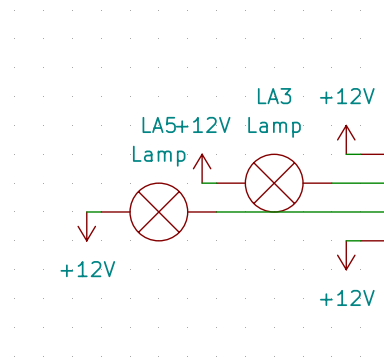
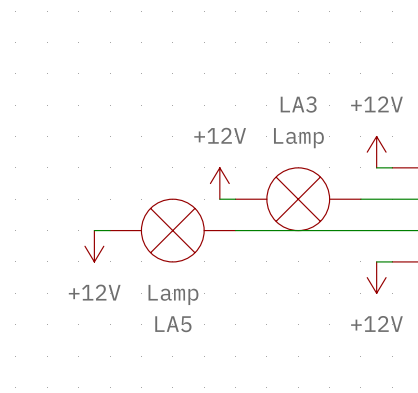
LA5 name position: LA5 (159, 124) -> LA5 (173, 324)
LA5 value position: Lamp (159, 156) -> Lamp (173, 294)

